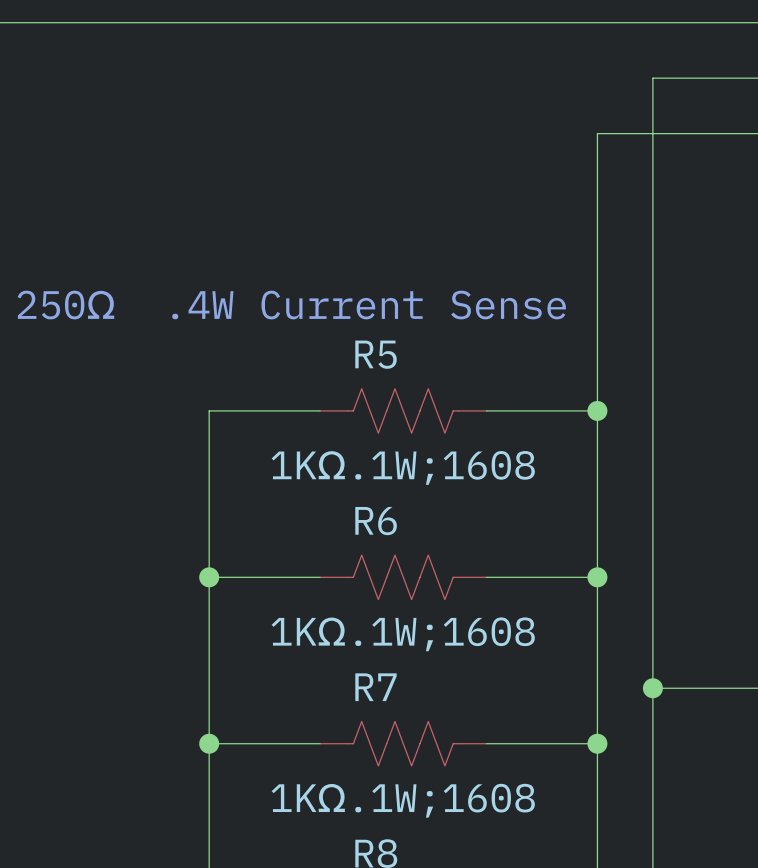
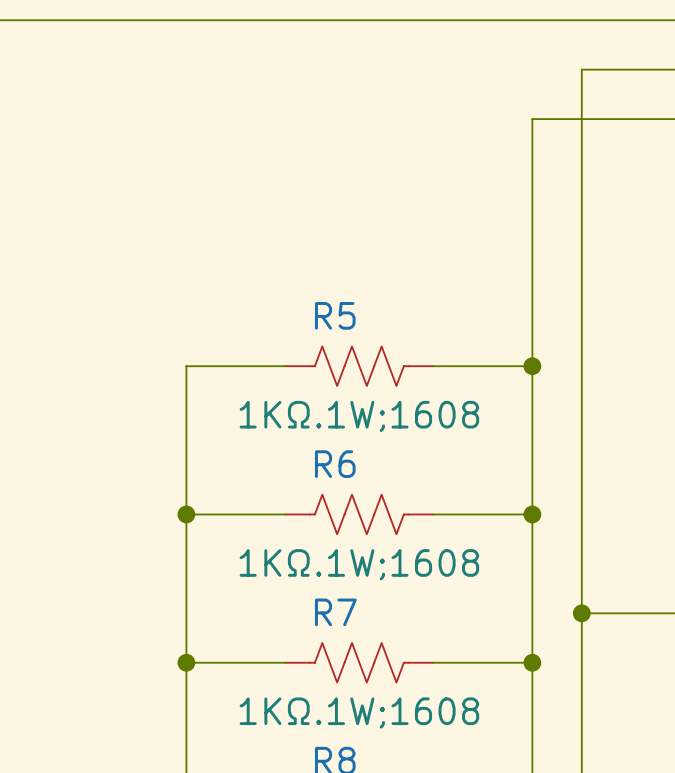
text: 250Ω .4W Current Sense (291, 305) -> none

